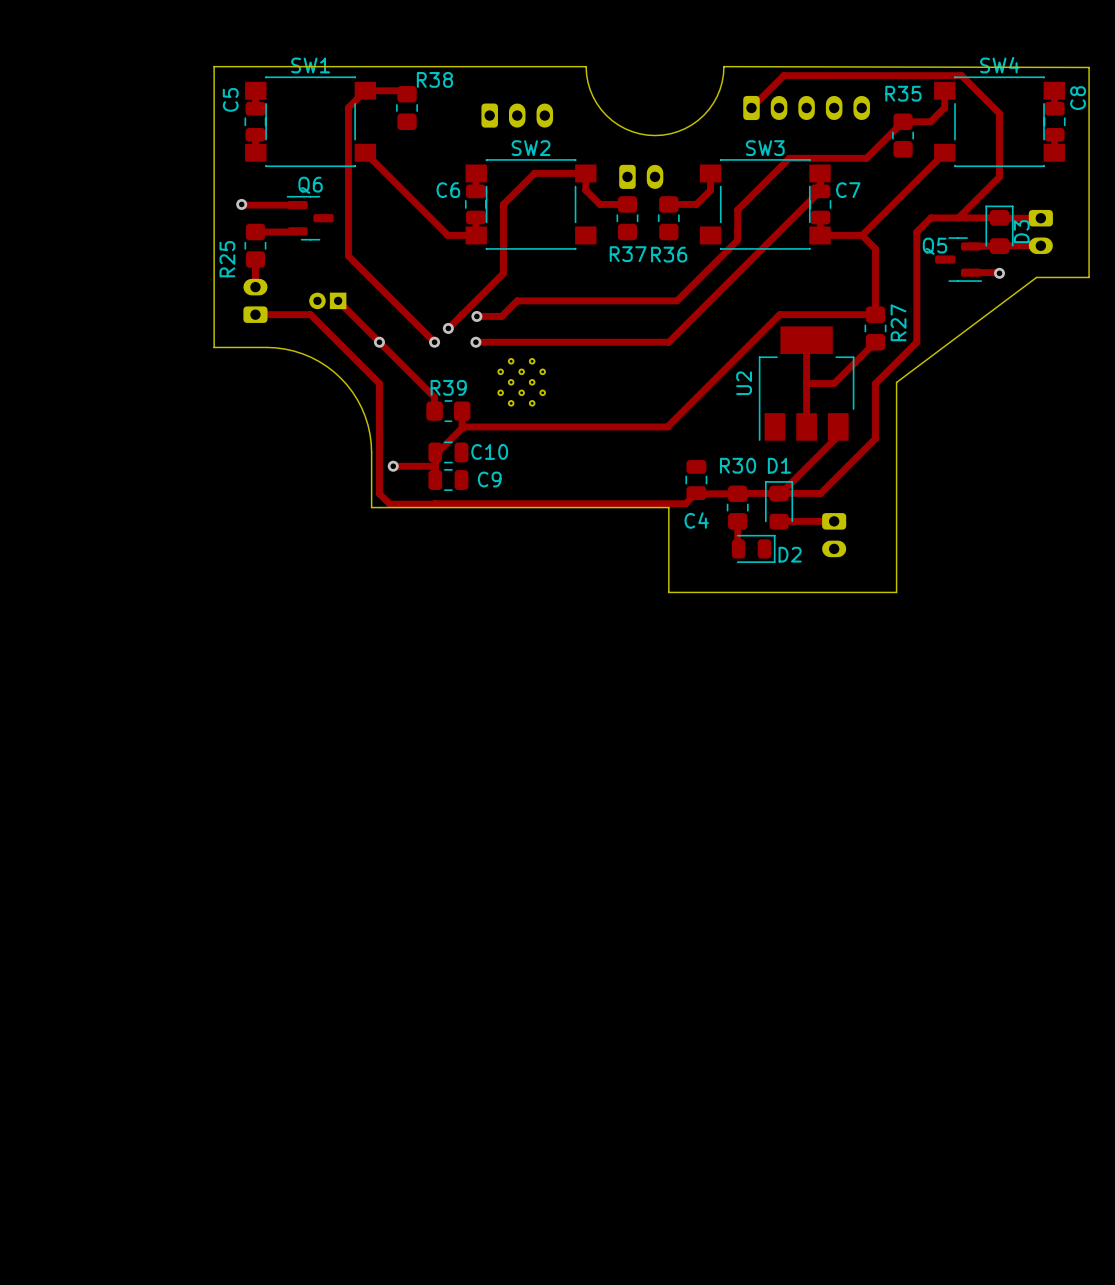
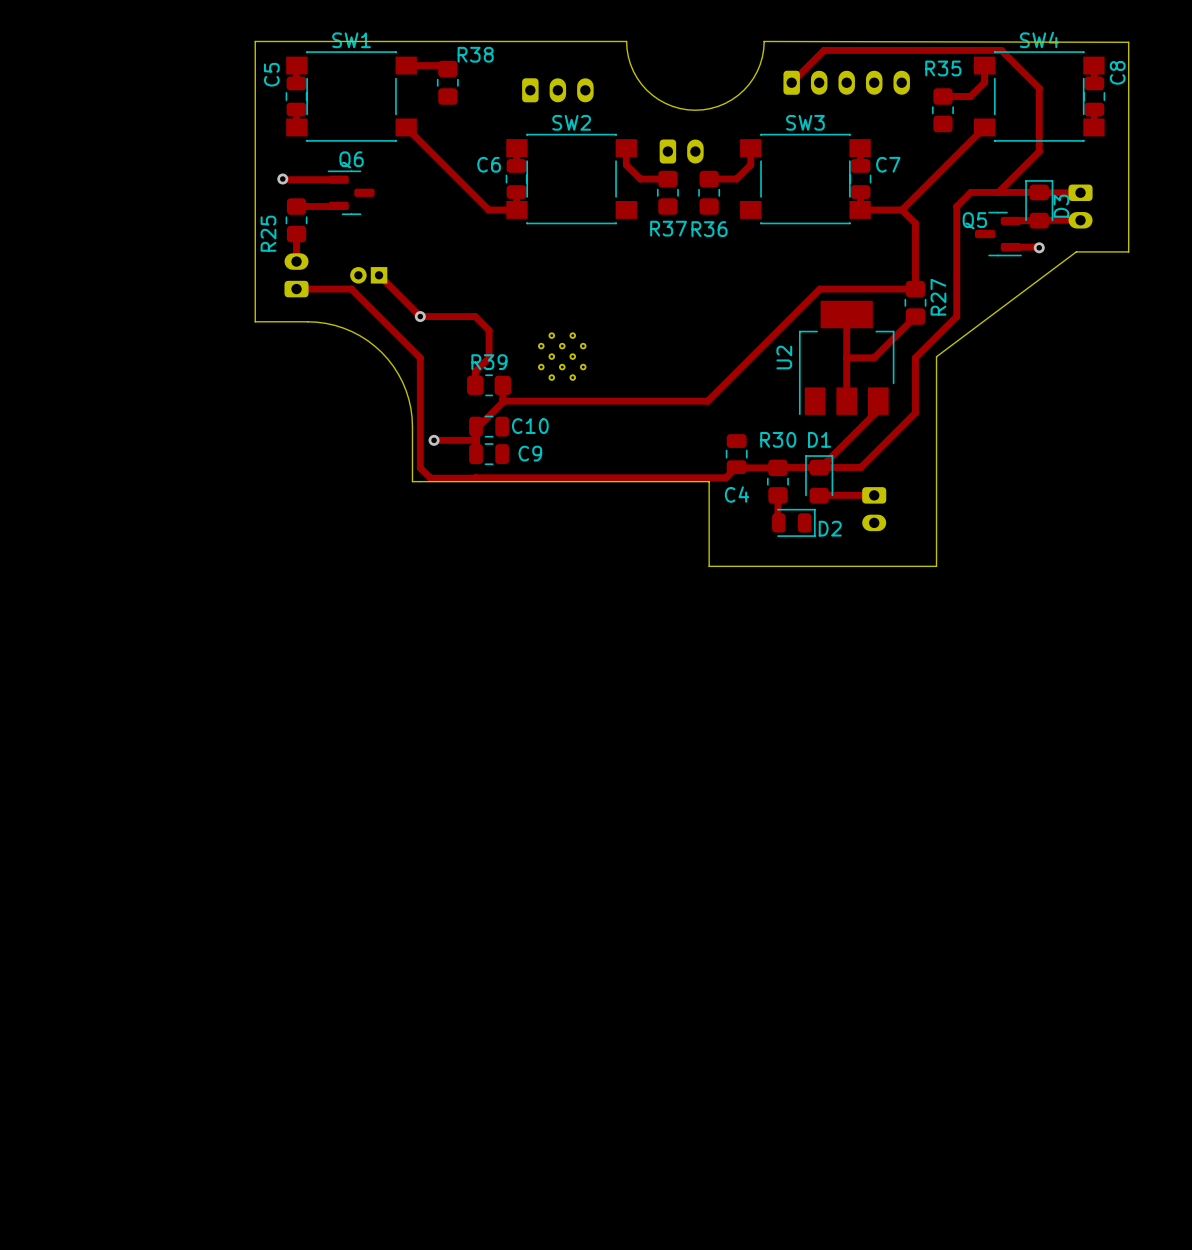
track: (365, 90) (348, 107) (348, 256) (434, 342) -> none
track: (903, 121) (866, 158) (789, 158) (737, 209) (737, 240) (677, 300) (517, 300) (501, 316) (476, 316) -> none
track: (585, 173) (534, 173) (503, 204) (503, 273) (448, 328) -> none
track: (820, 173) (820, 191) (668, 342) (475, 342) -> none
via: (476, 316) -> none
via: (448, 328) -> none
track: (379, 342) (434, 397) -> (420, 316) (475, 316) (489, 330) (489, 357) (475, 371)
via: (434, 342) -> none
via: (475, 342) -> none

